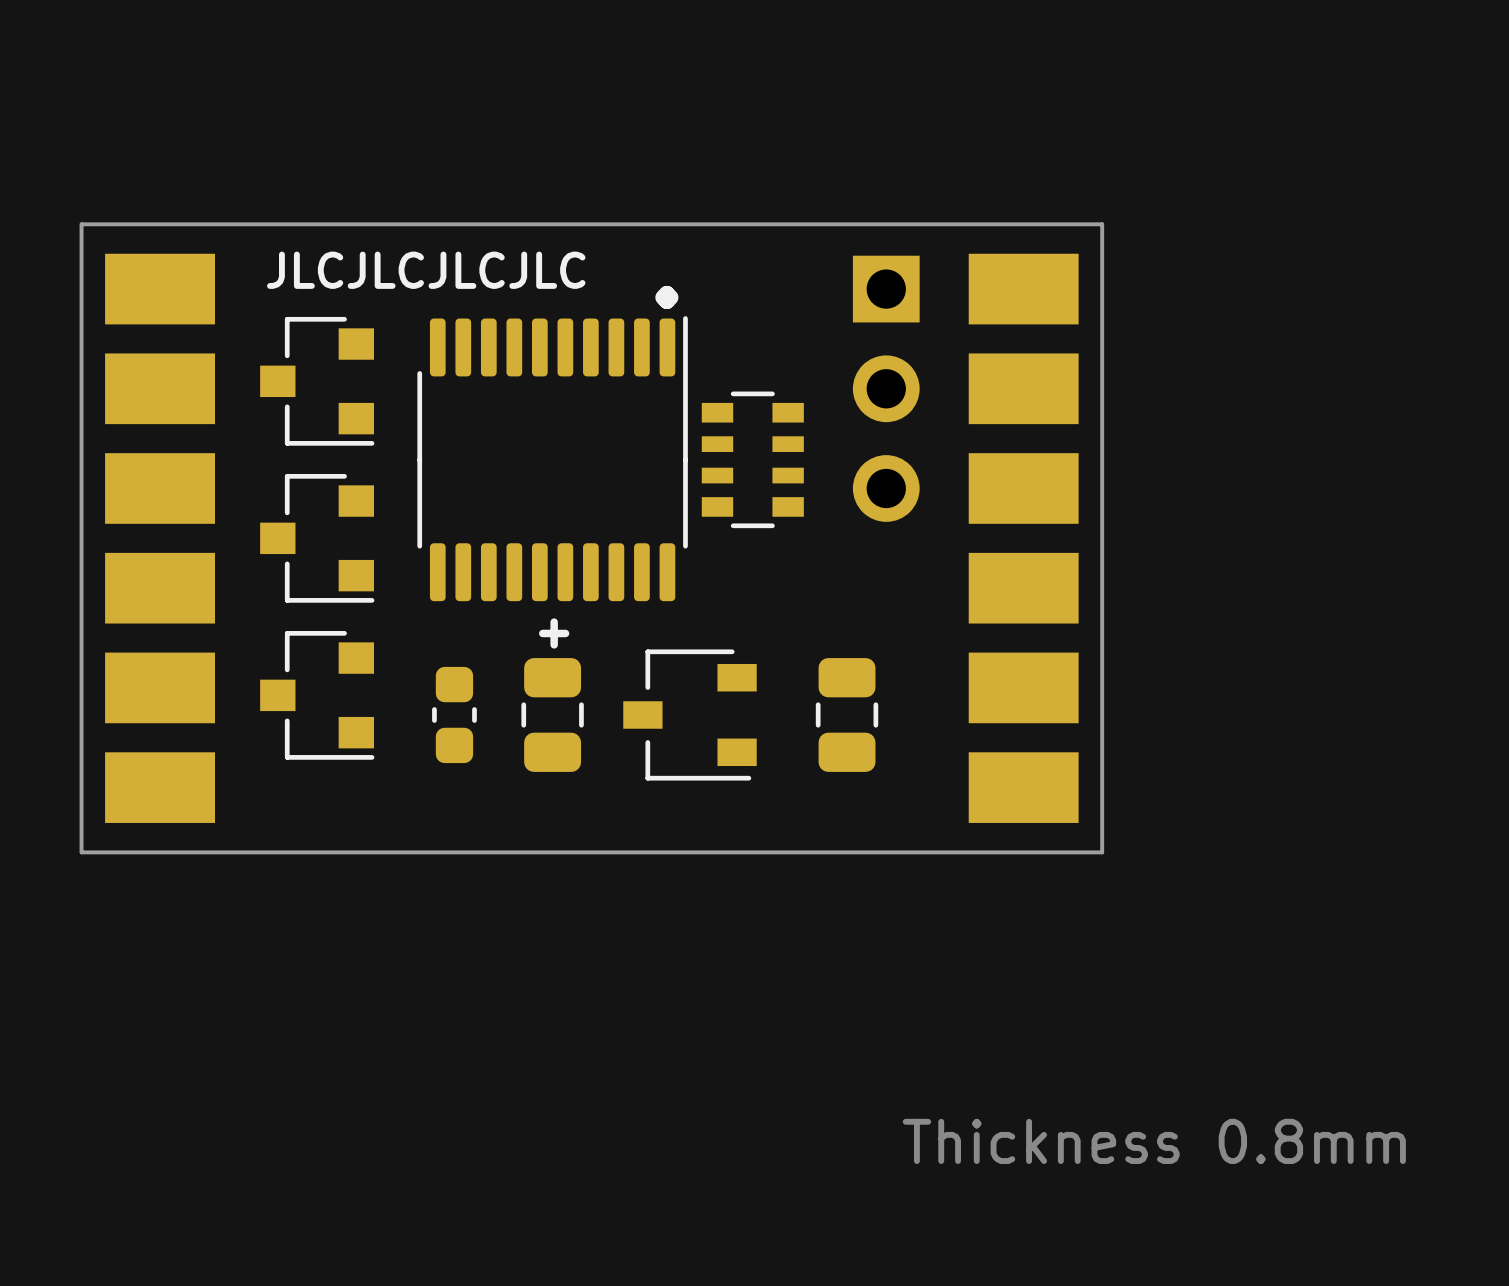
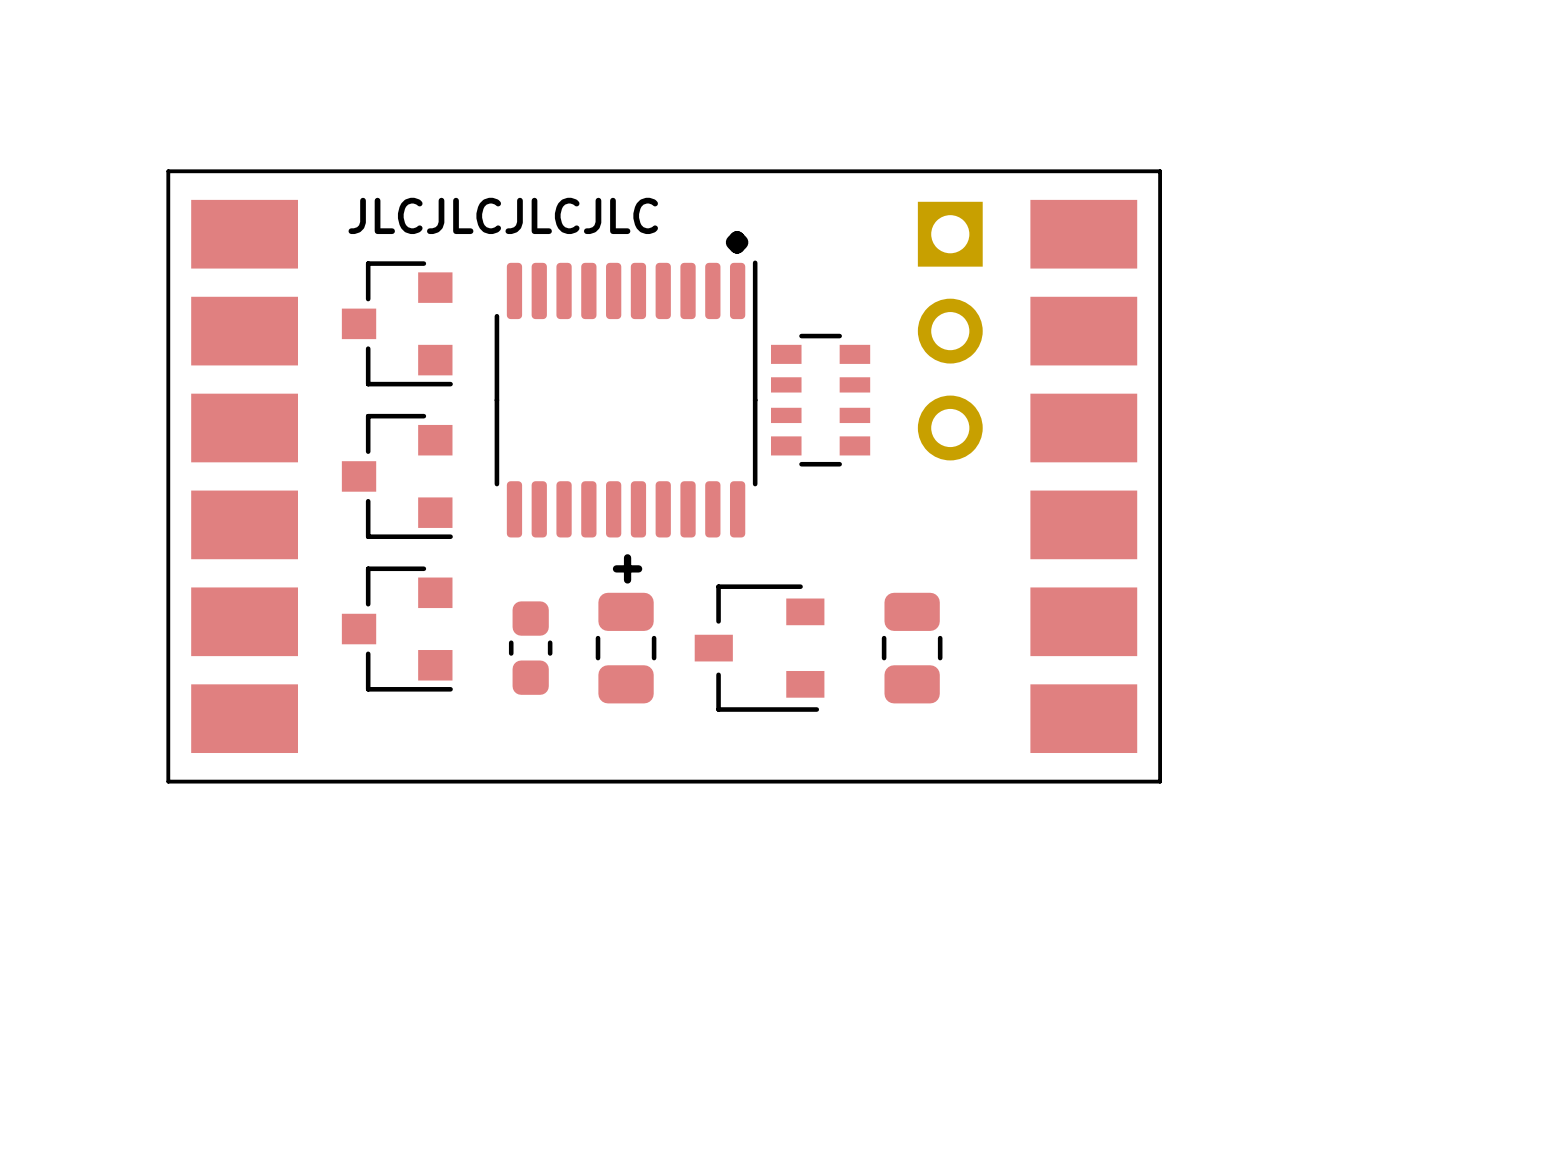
text: Thickness 0.8mm (1154, 1141) -> none

